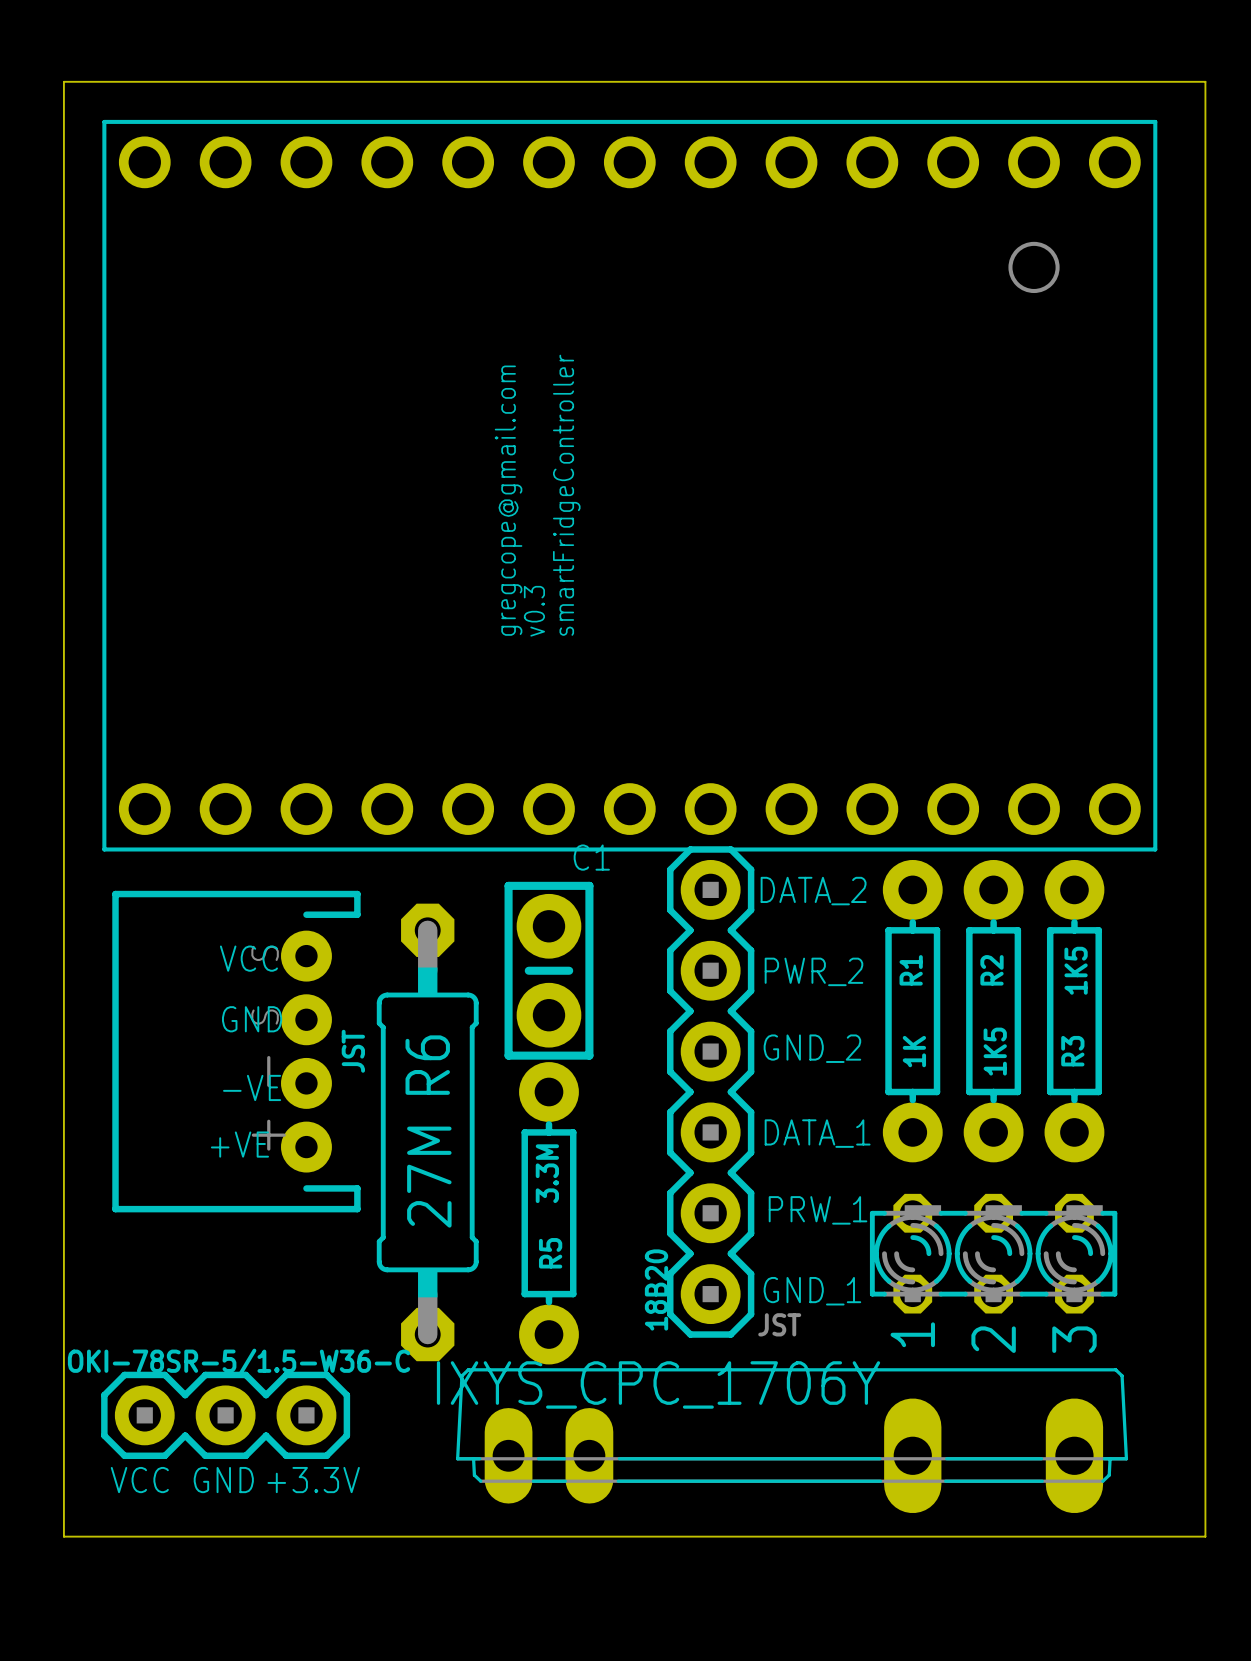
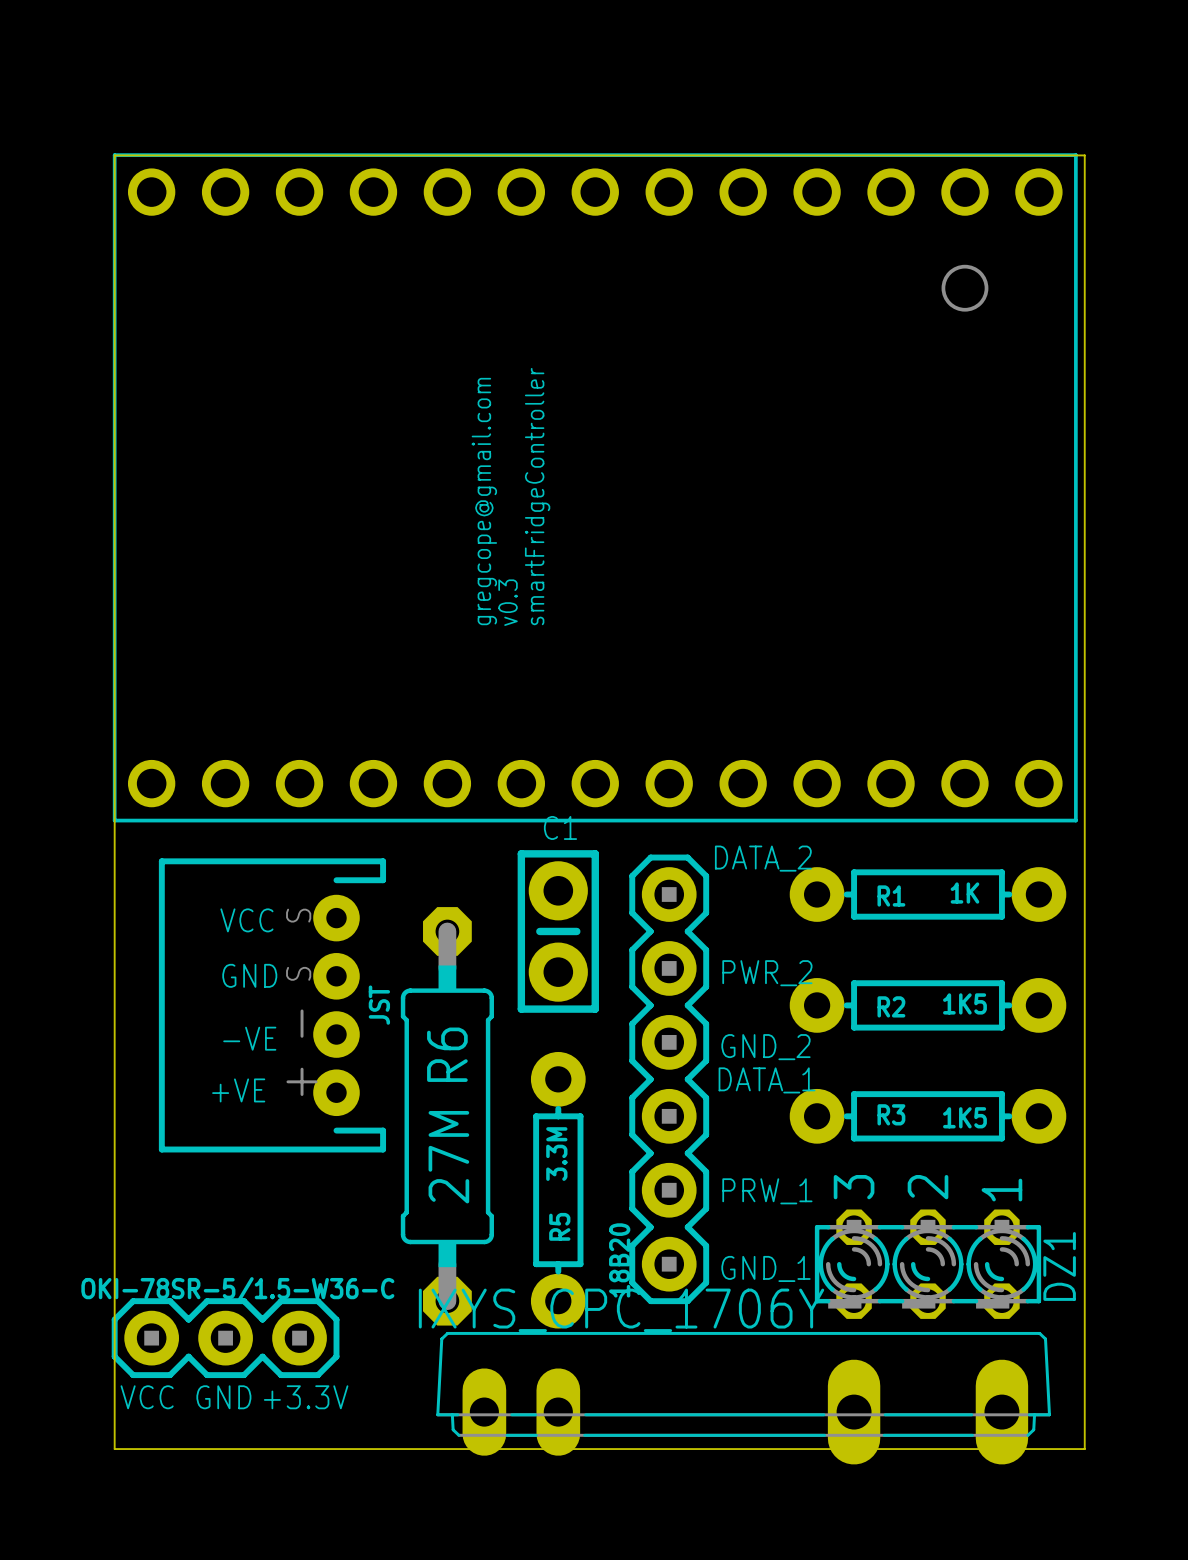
part position: (548, 970) -> (558, 931)
text position: PWR_2 (813, 971) -> PWR_2 (767, 973)
R1 rotation: 0° (912, 1011) -> 90° clockwise (928, 894)
R2 rotation: 0° (993, 1011) -> 90° clockwise (928, 1005)
R3 rotation: 0° (1074, 1011) -> 90° clockwise (928, 1116)
text position: GND_2 (812, 1048) -> GND_2 (765, 1047)
JST position: (236, 1051) -> (272, 1005)
18B20 position: (710, 1092) -> (669, 1079)
R6 position: (427, 1132) -> (447, 1116)
text position: PRW_1 (818, 1210) -> PRW_1 (767, 1191)
R5 position: (548, 1213) -> (558, 1190)
part: (993, 1253) -> none
text position: GND_1 (812, 1291) -> GND_1 (765, 1268)
18B20 value: JST (779, 1324) -> none
DZ1: none -> (928, 1264)
IXYS_CPC_1706Y position: (792, 1440) -> (743, 1398)
board edge: (104, 1536) (63, 1536) (63, 81) (1205, 81) (1205, 1536) (1165, 1536) -> (114, 1449) (114, 155) (1084, 155) (1084, 1449)

